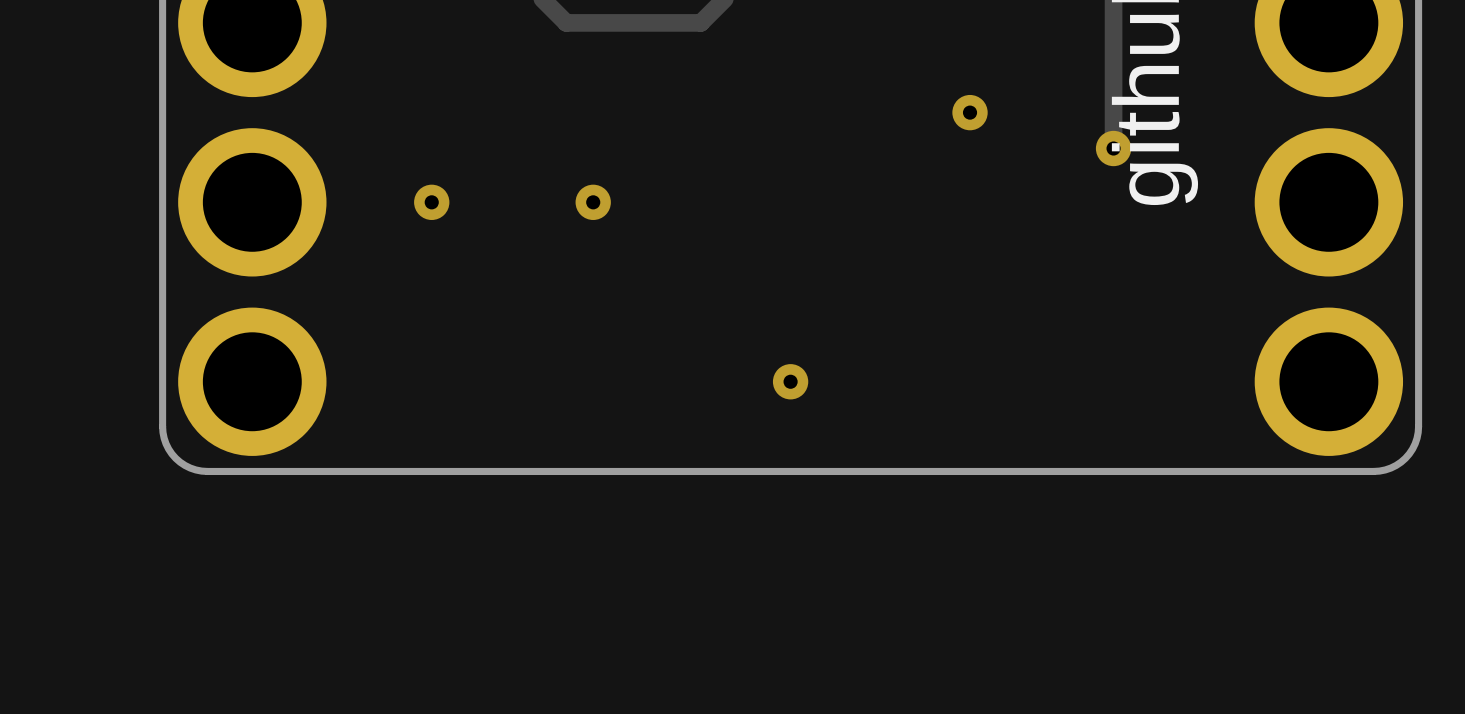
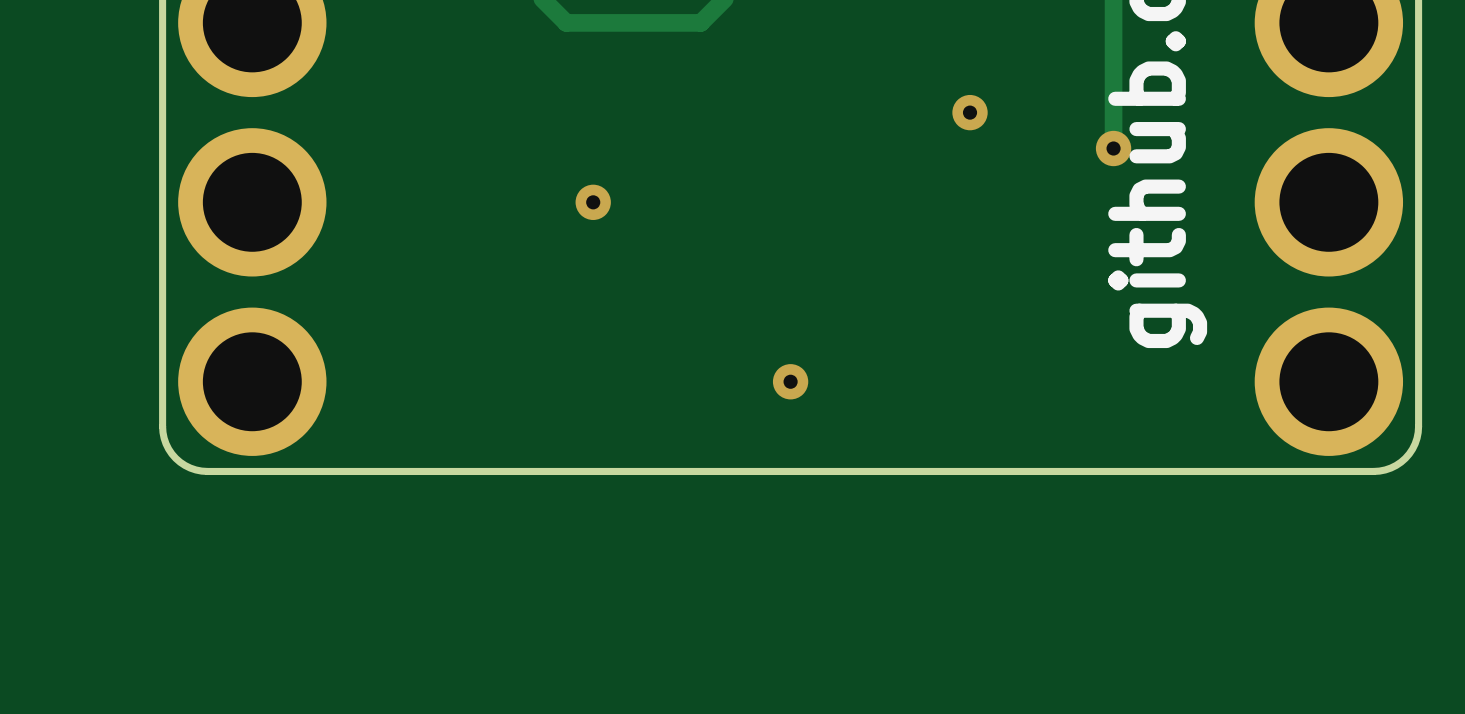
via: (431, 202) -> none

